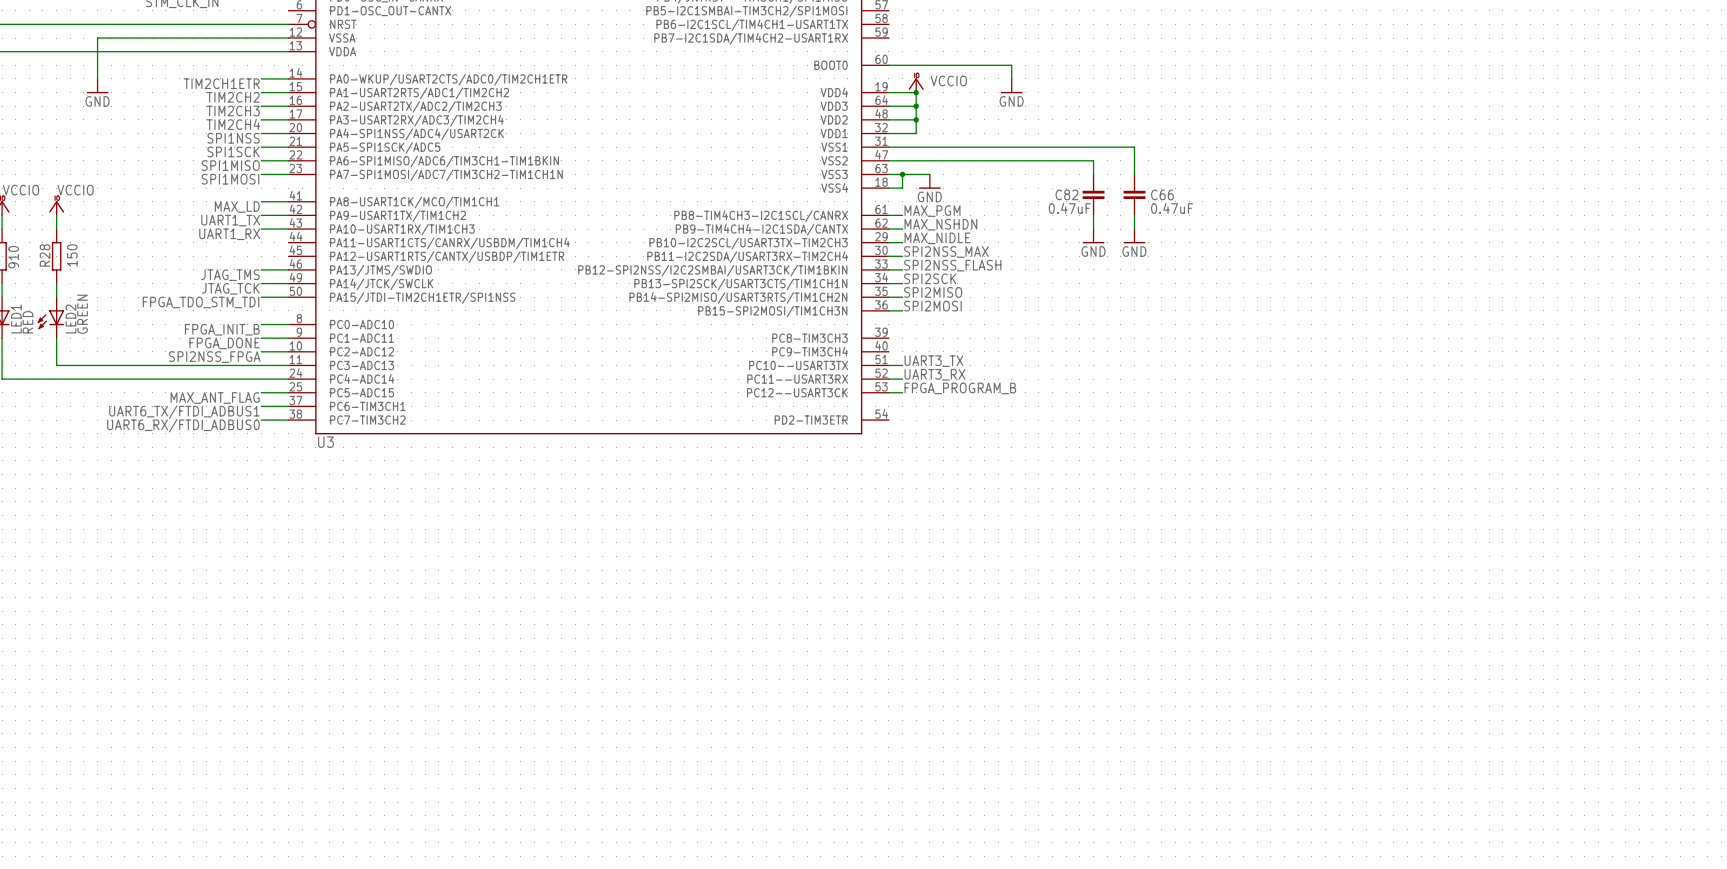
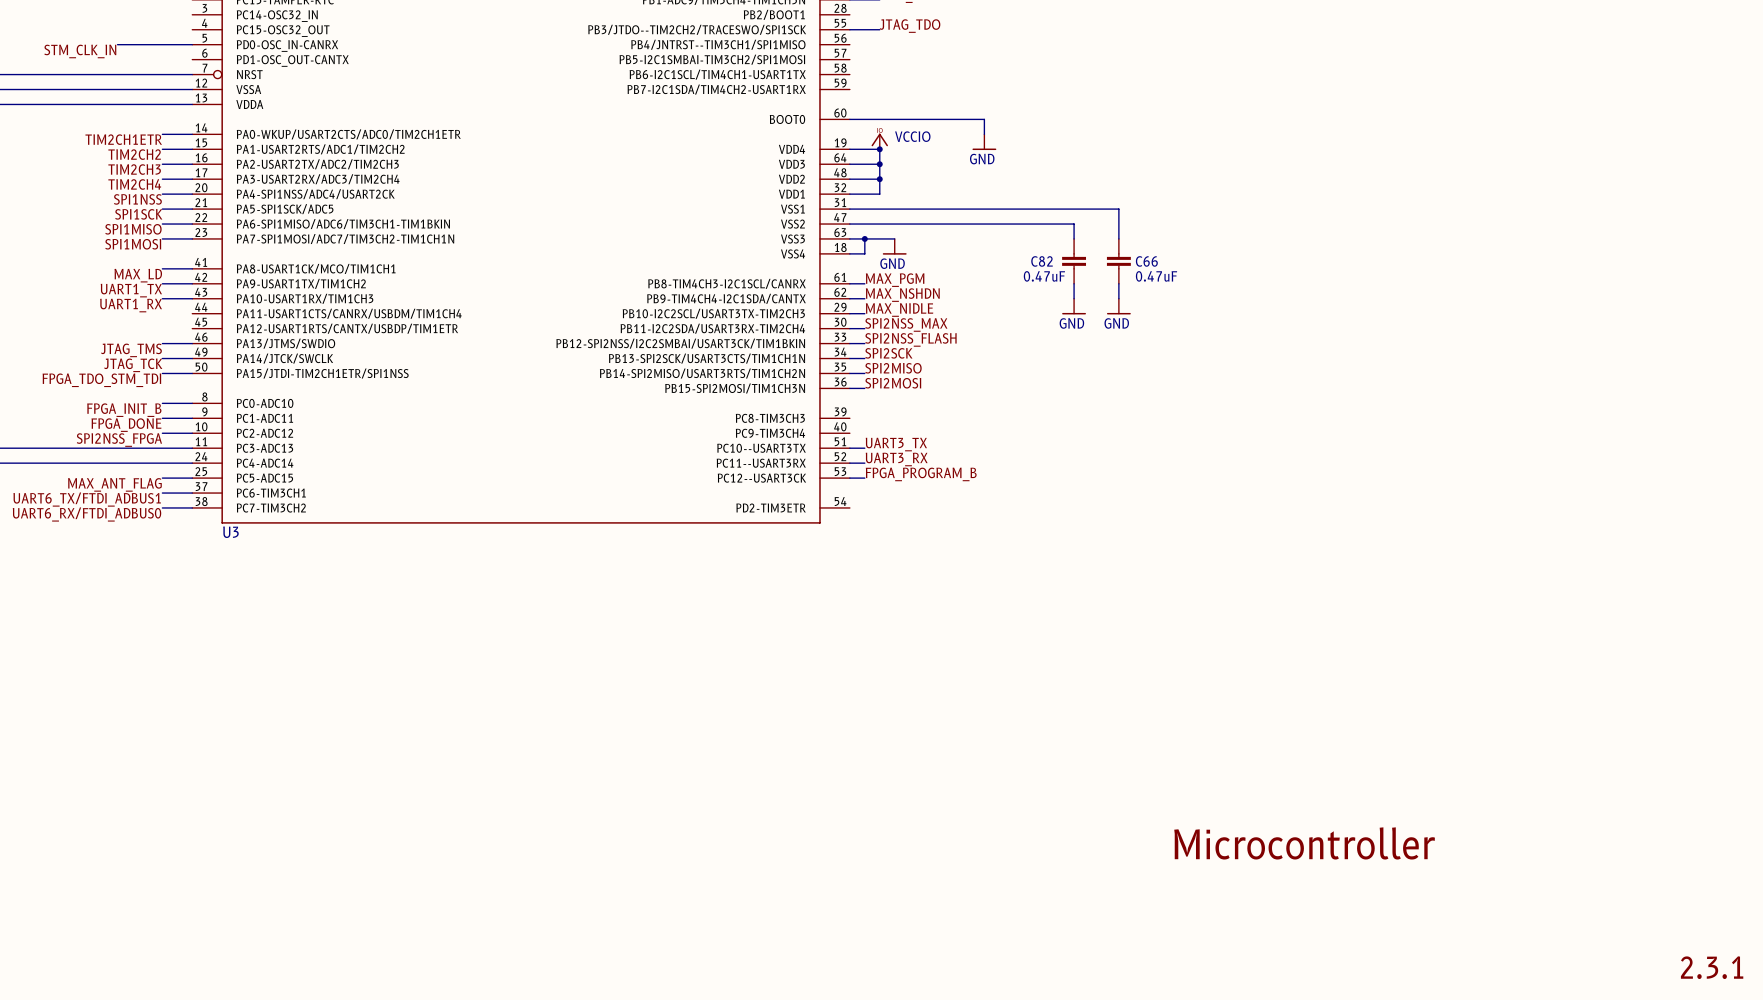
text: none -> Microcontroller (1304, 843)
text: none -> 2.3.1 (1712, 967)

